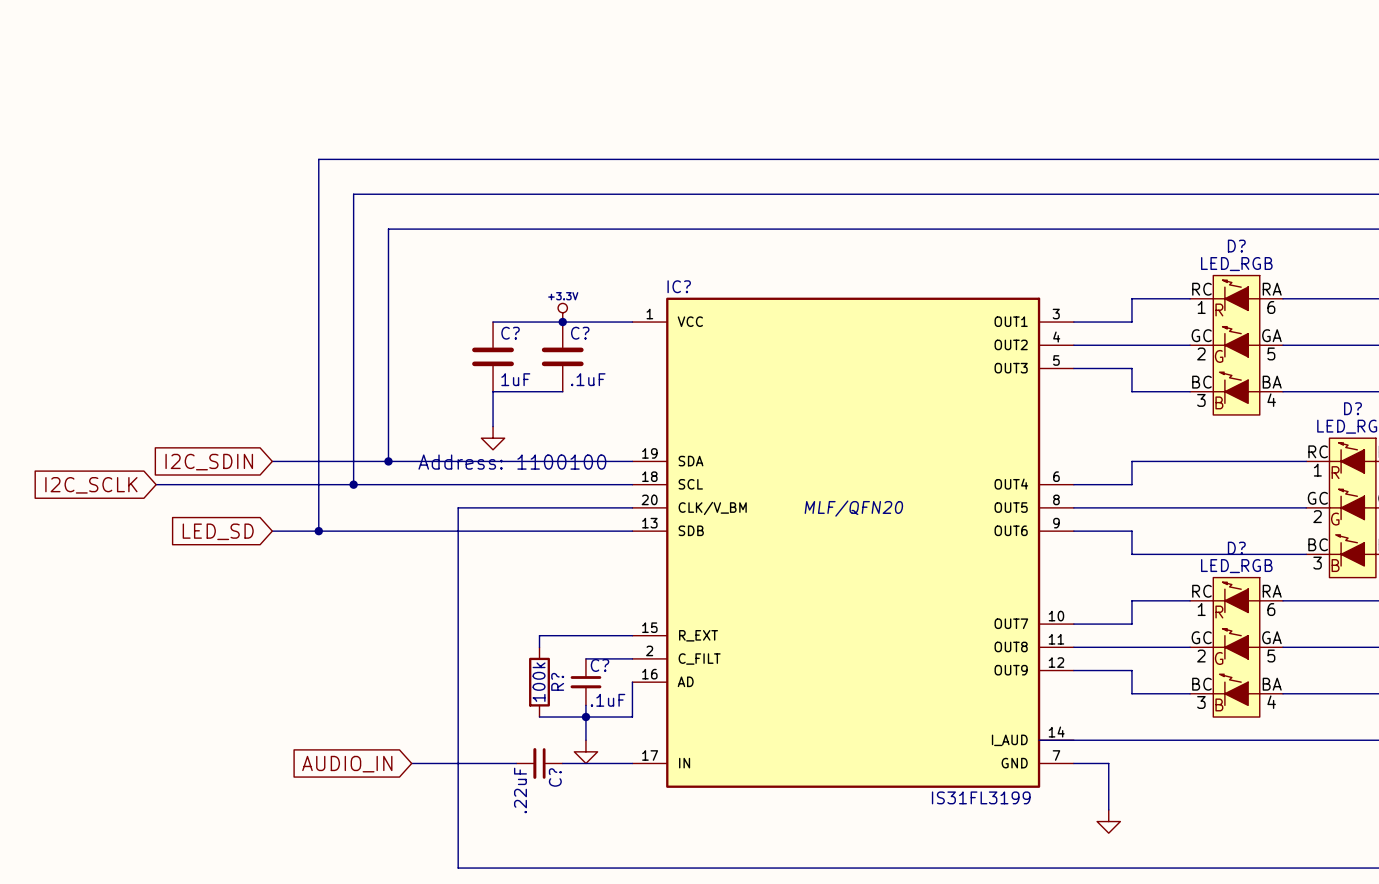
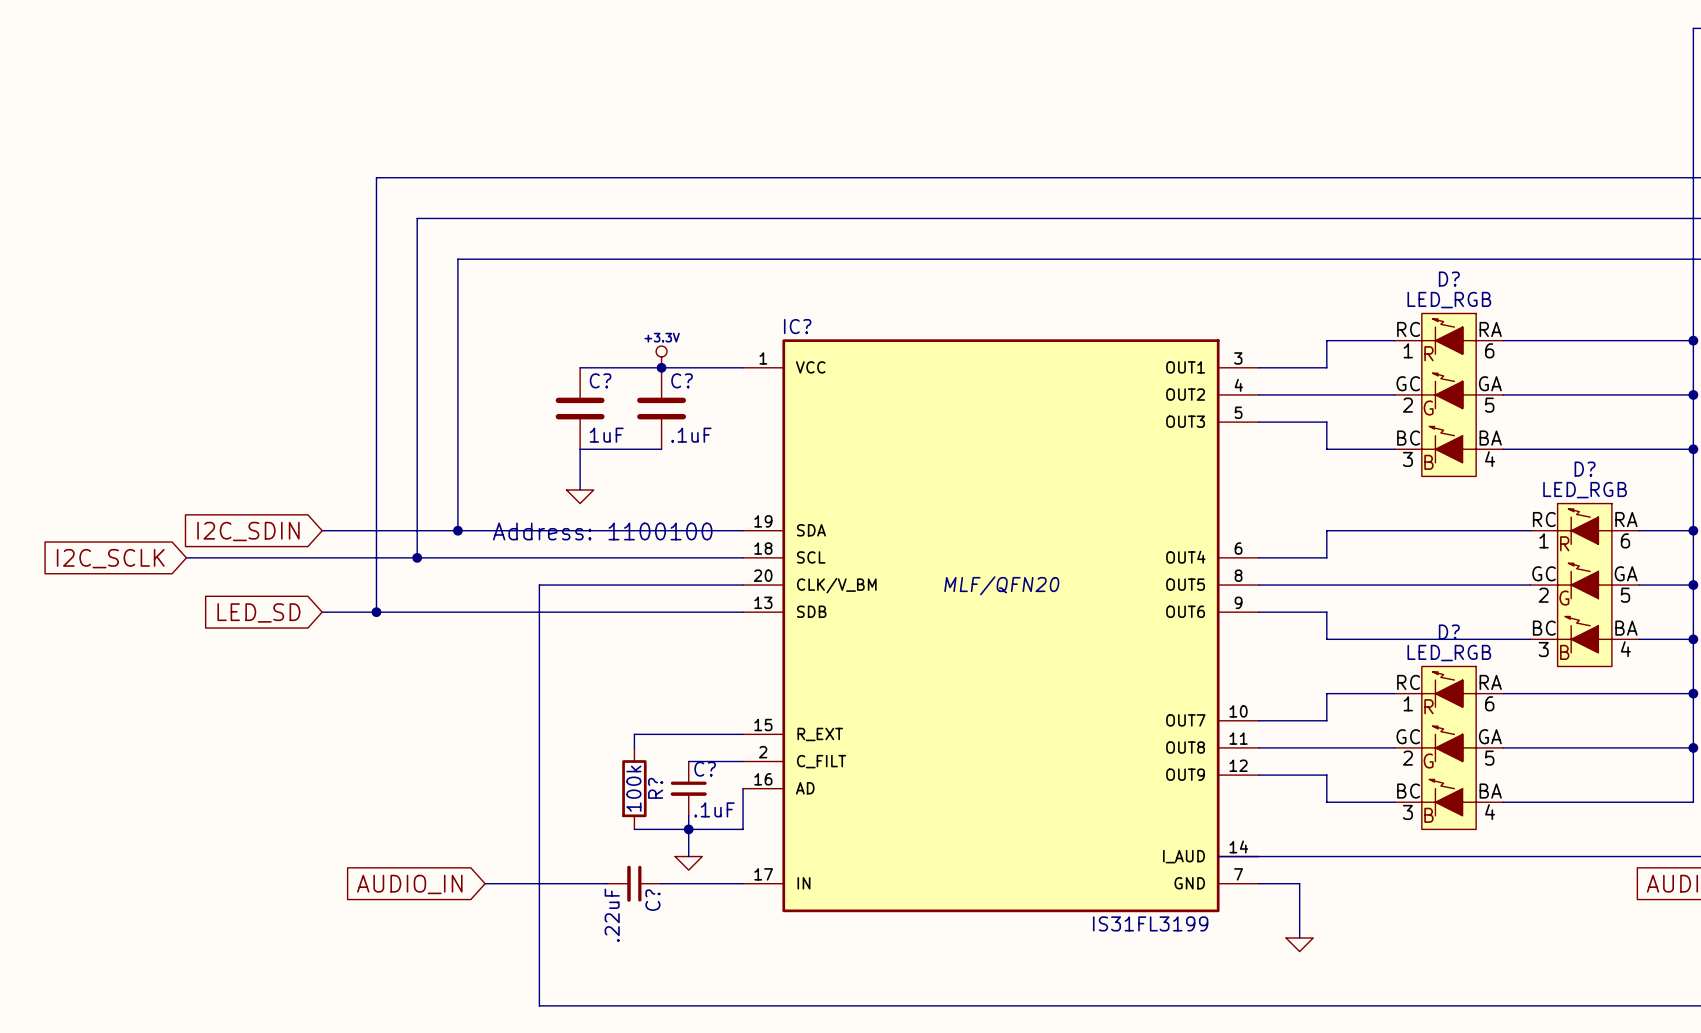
power symbol shape: [481, 426, 505, 450] -> [566, 489, 594, 504]
power symbol shape: [574, 740, 598, 764] -> [675, 856, 703, 871]
power symbol shape: [1097, 809, 1121, 834] -> [1286, 938, 1314, 952]

